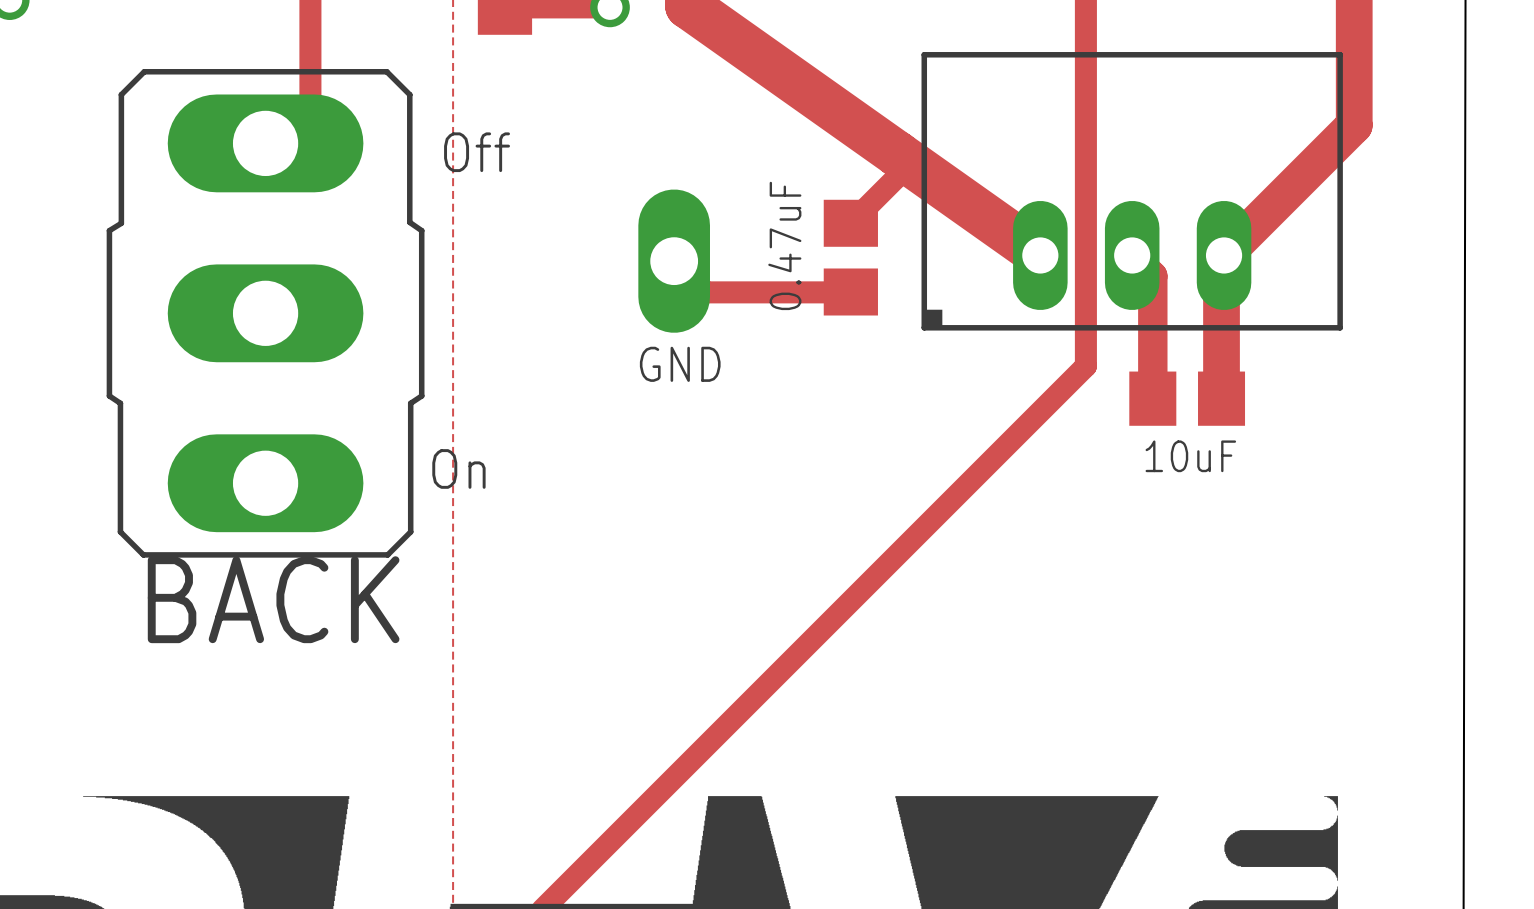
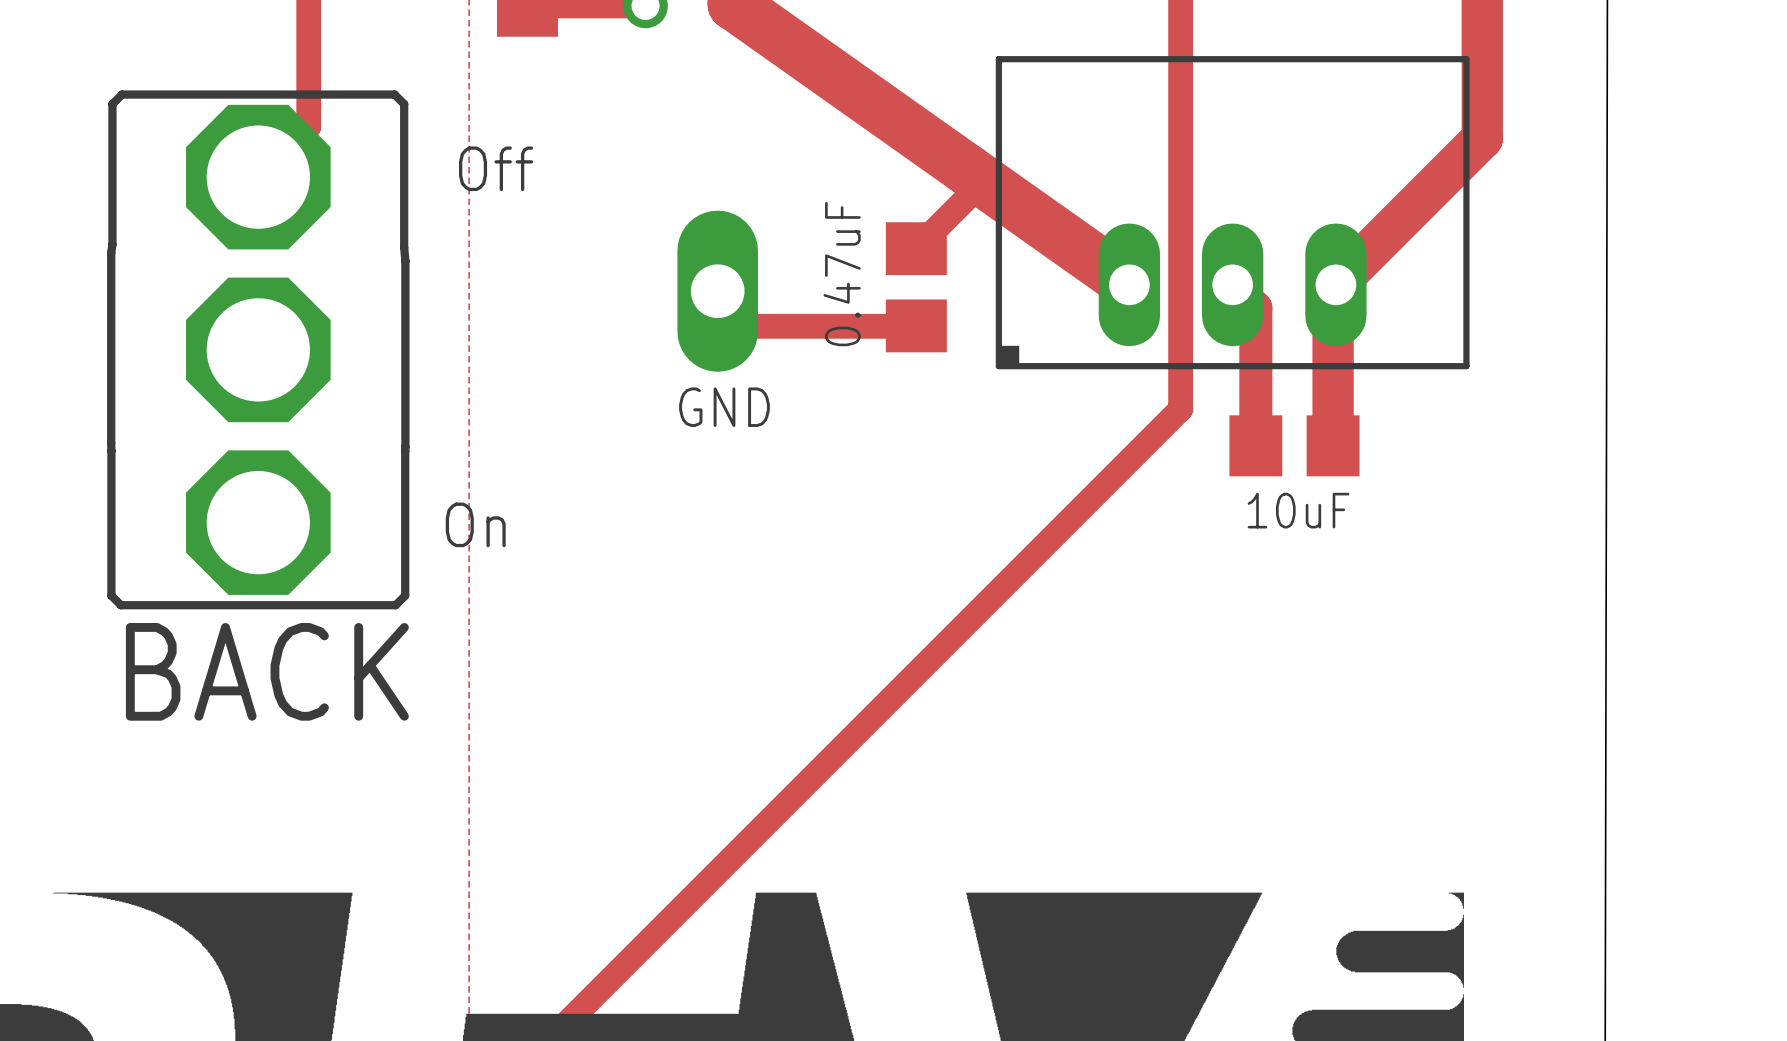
BACK footprint: [106, 69, 425, 558] -> [107, 90, 410, 610]

